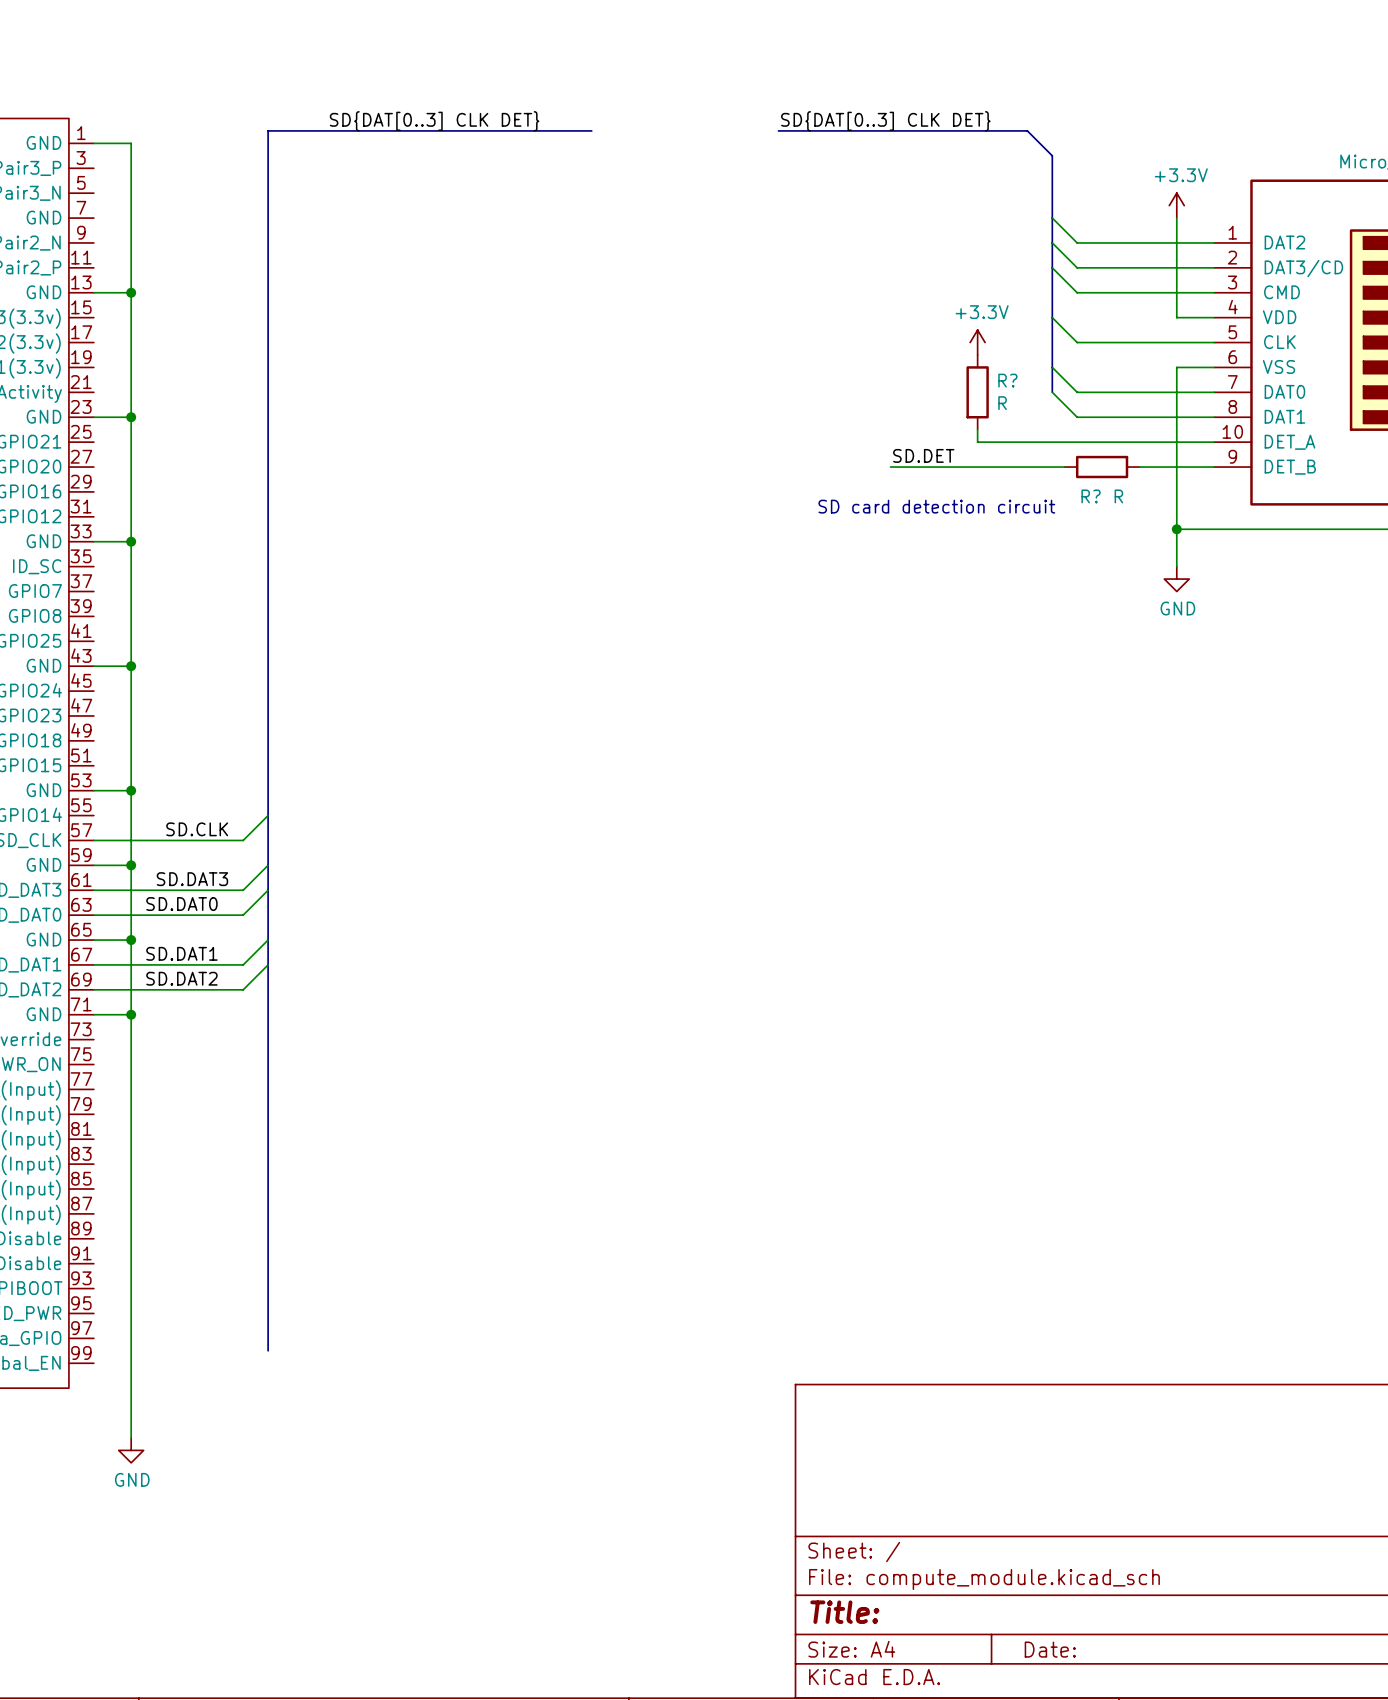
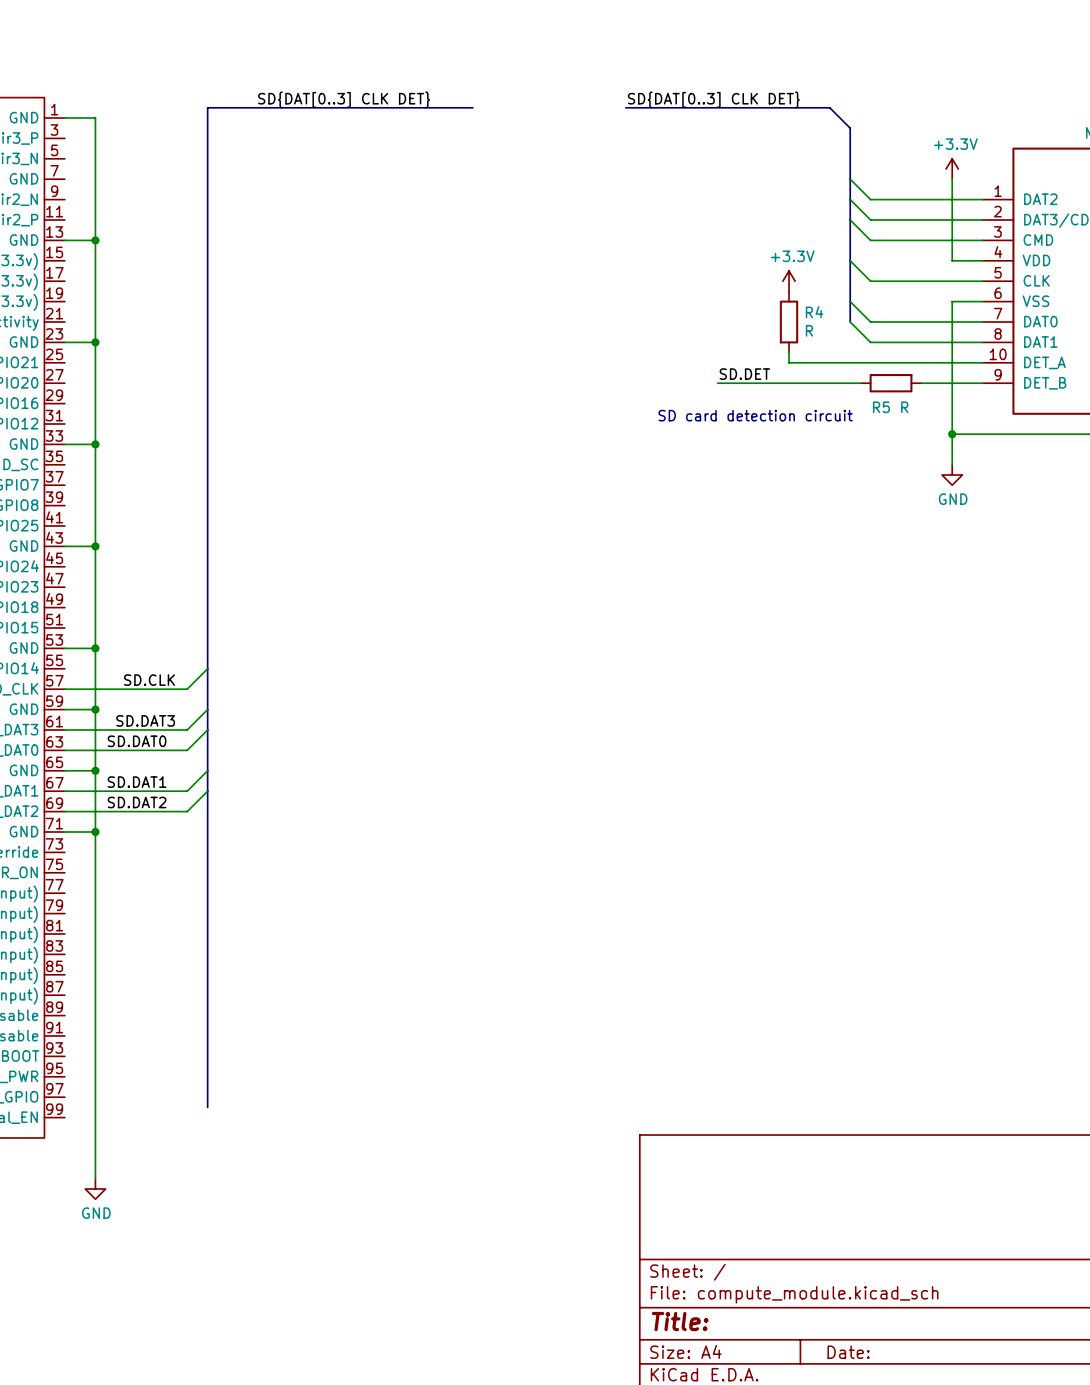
R? name: R? (1007, 380) -> R4 (814, 312)
R? name: R? (1091, 496) -> R5 (881, 407)

